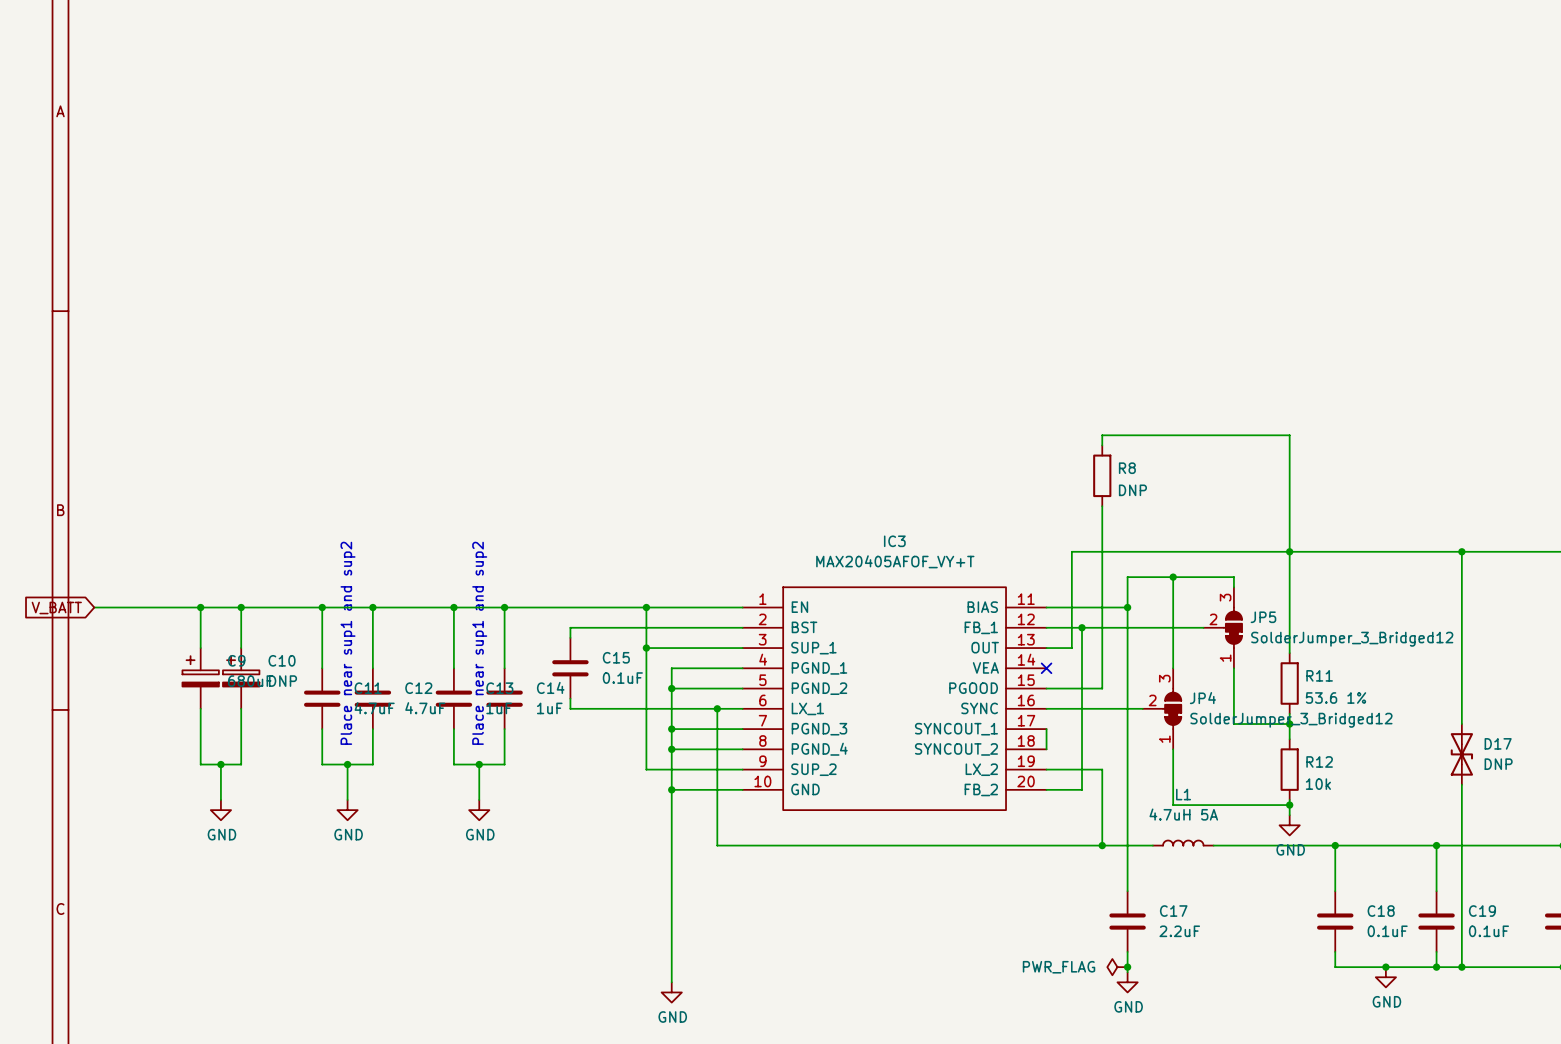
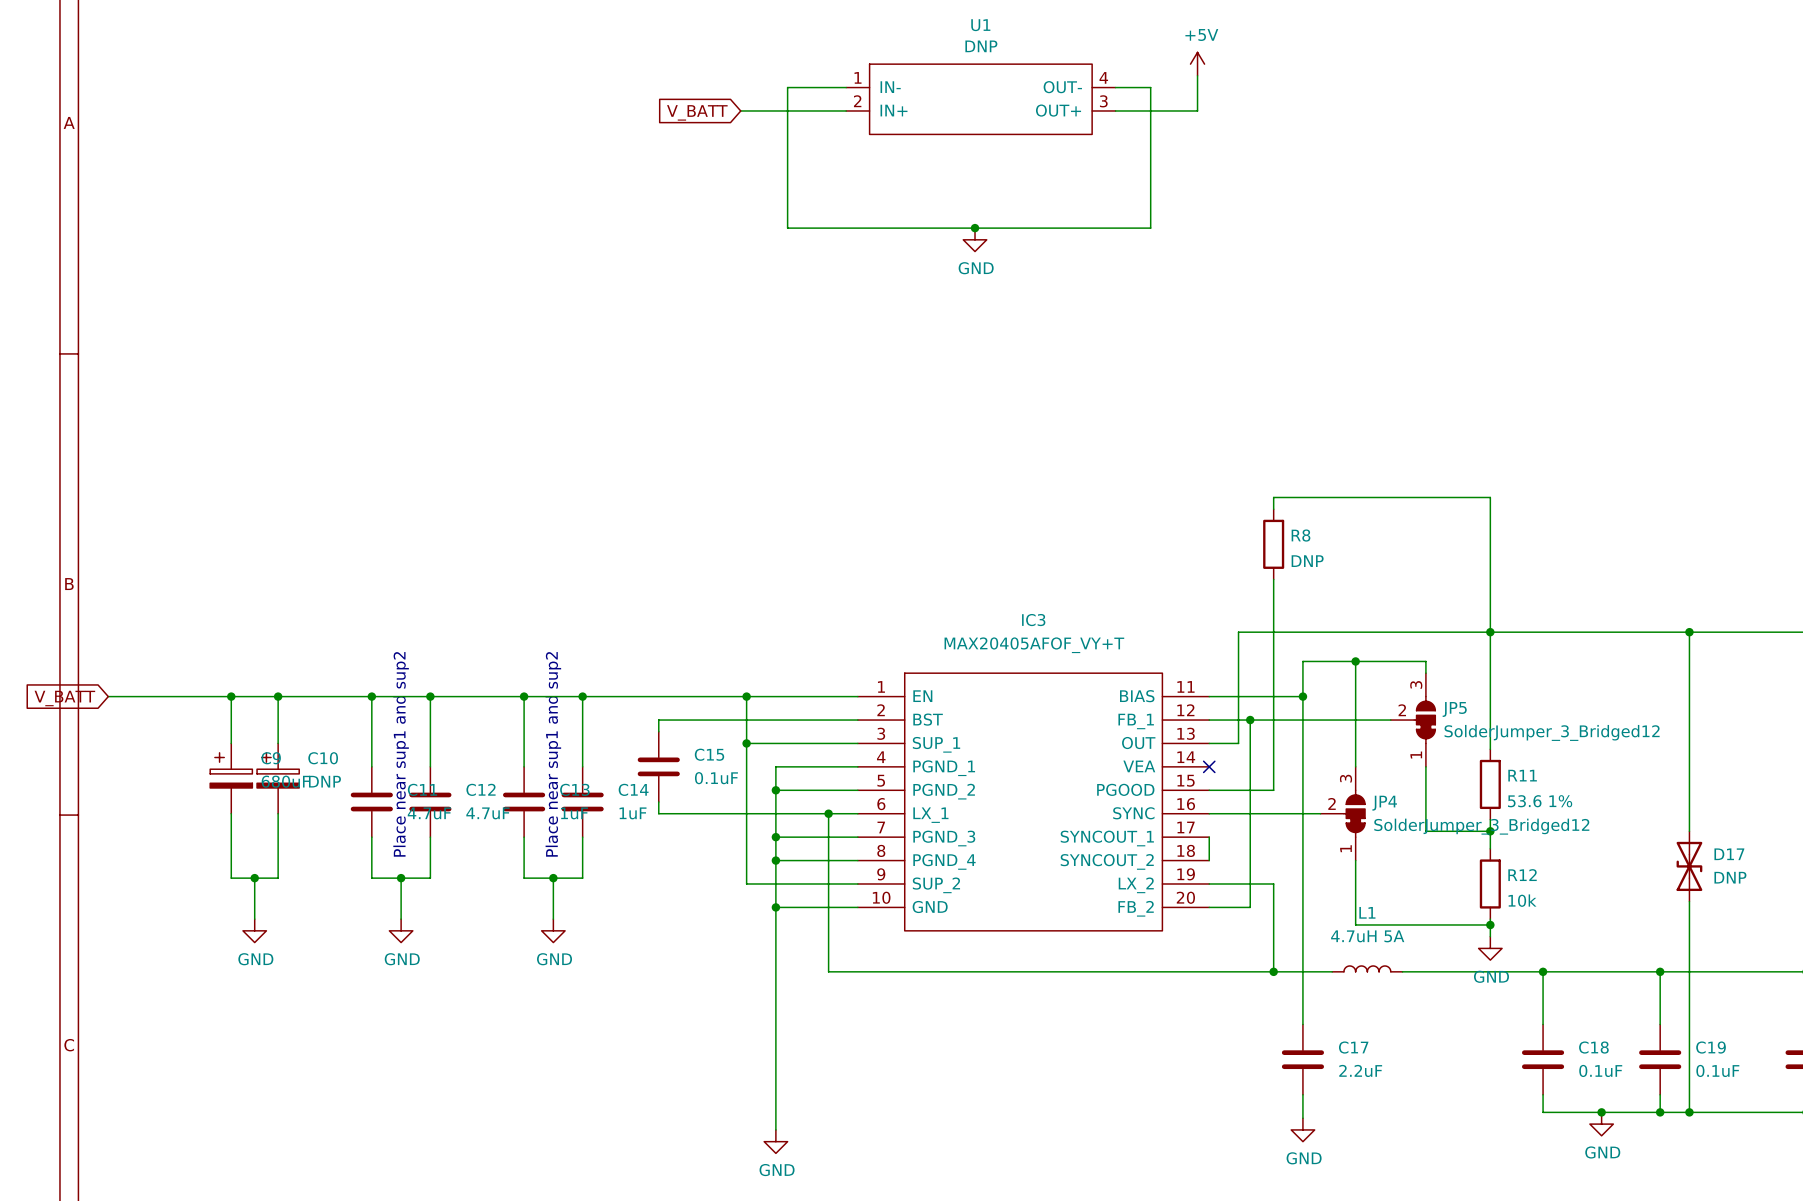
power symbol: none -> +5V (1197, 64)
wire: none -> (1197, 75) (1197, 110) (1115, 110)
wire: none -> (846, 87) (787, 87) (787, 228) (1150, 228) (1150, 87) (1115, 87)
U1: none -> DNP (980, 99)
global label: none -> V_BATT (697, 112)
wire: none -> (740, 110) (846, 110)
junction: none -> (975, 228)
power symbol: none -> GND (975, 239)
power symbol: PWR_FLAG (1117, 967) -> none
junction: (1127, 967) -> none

